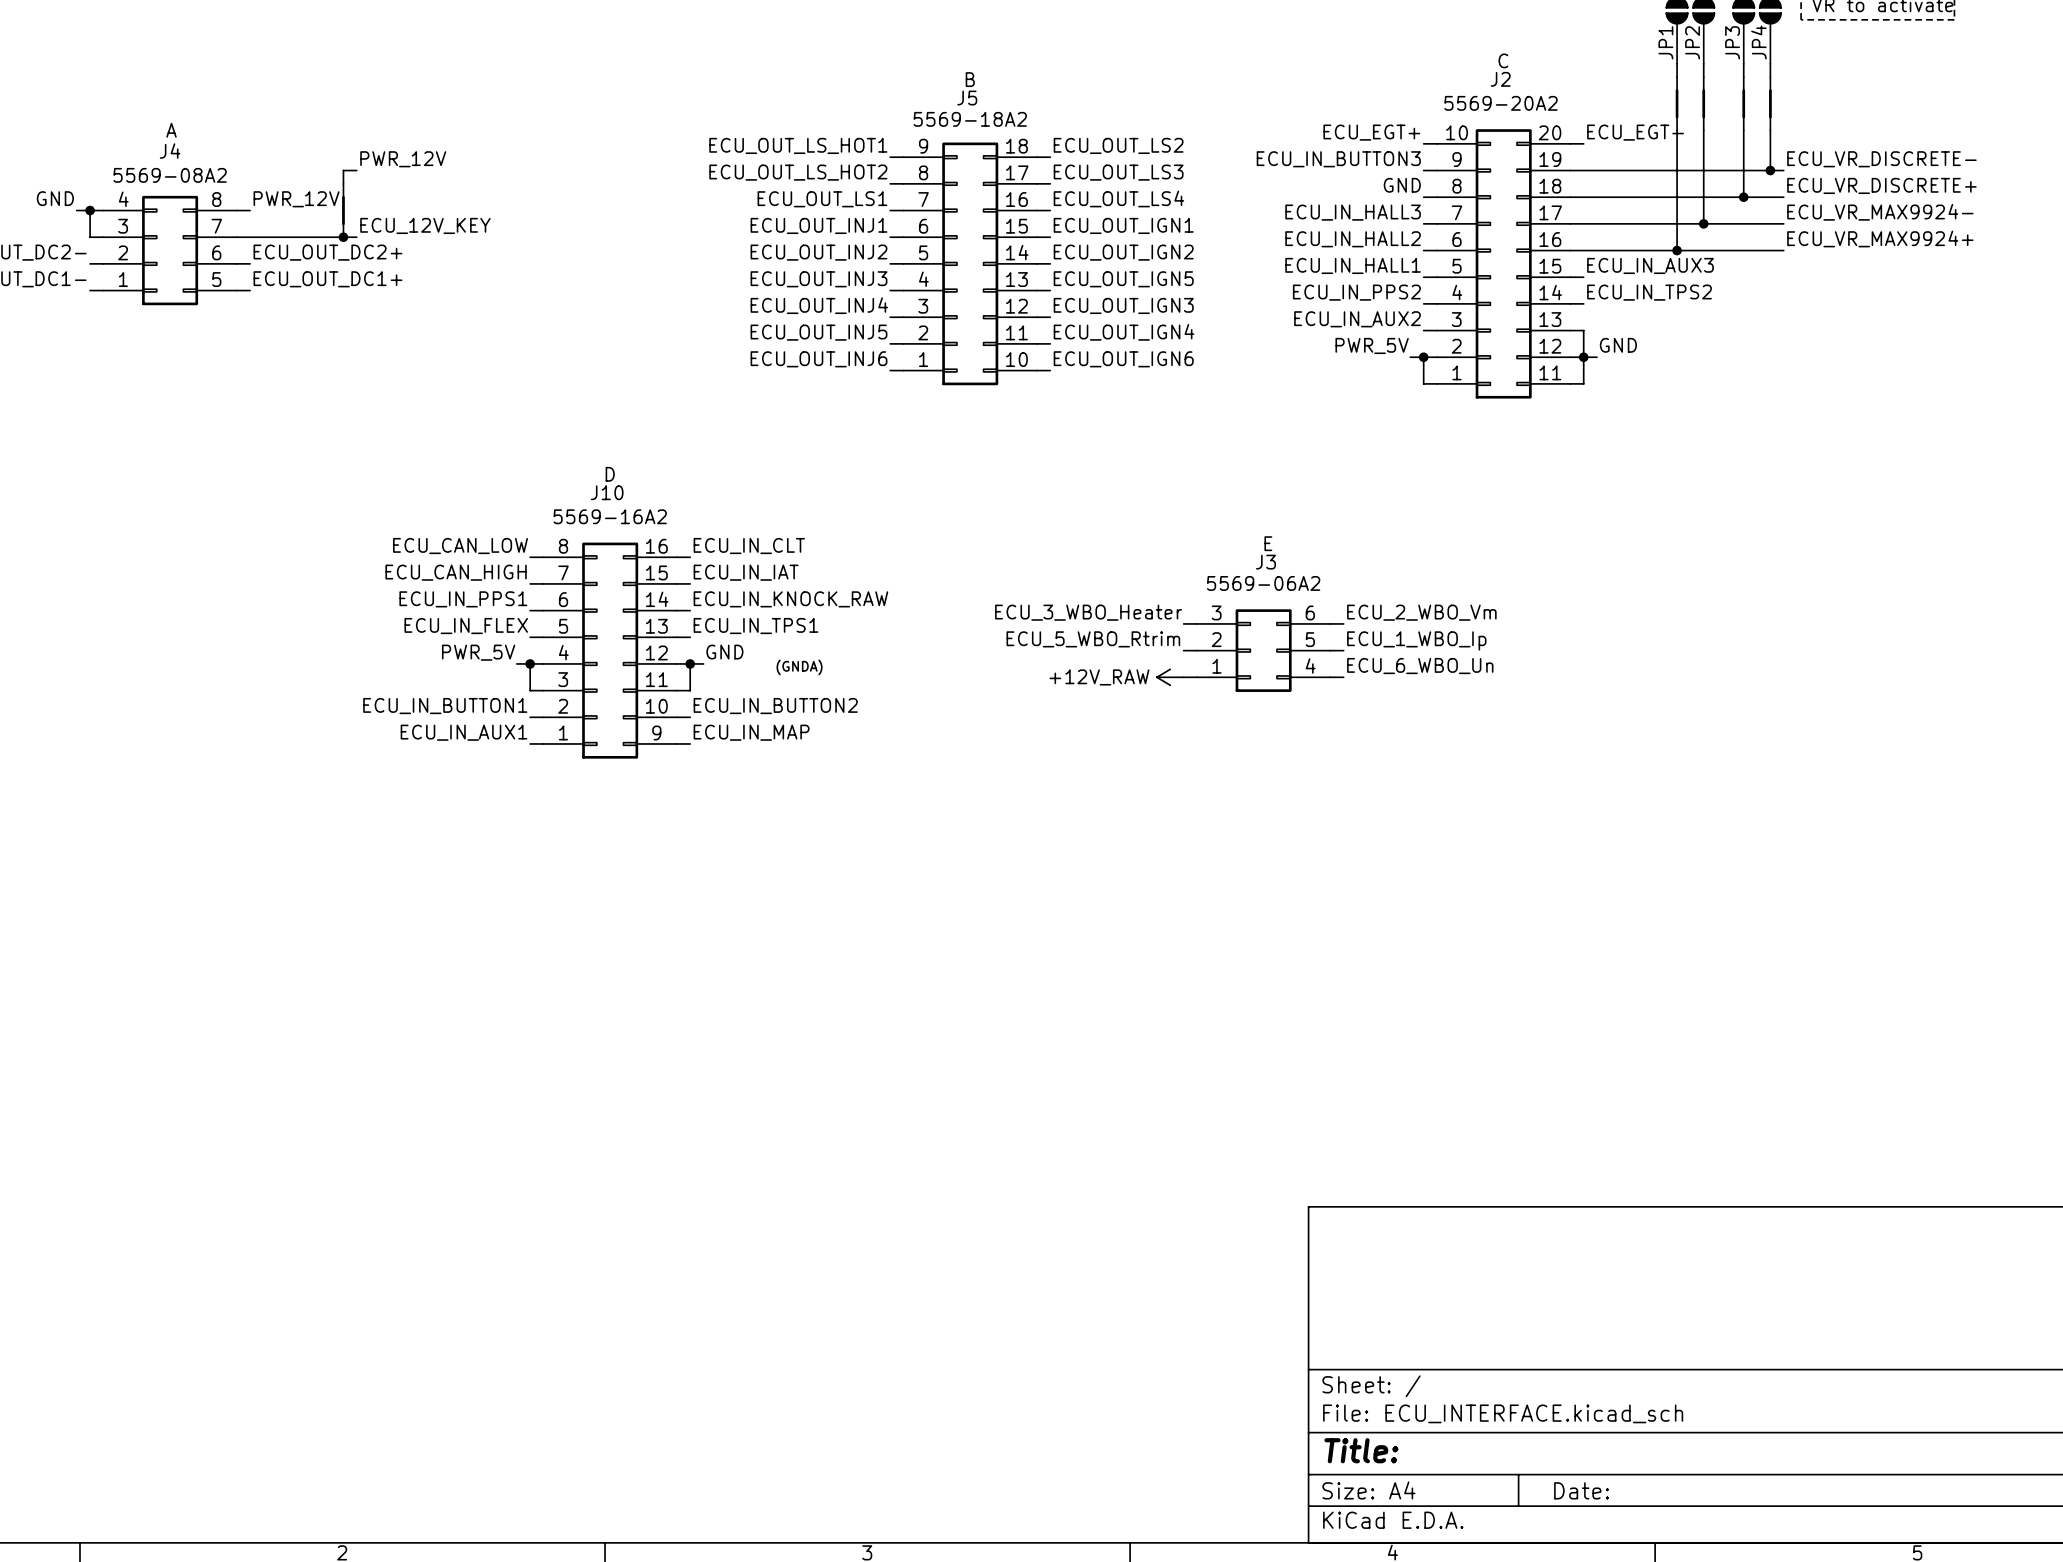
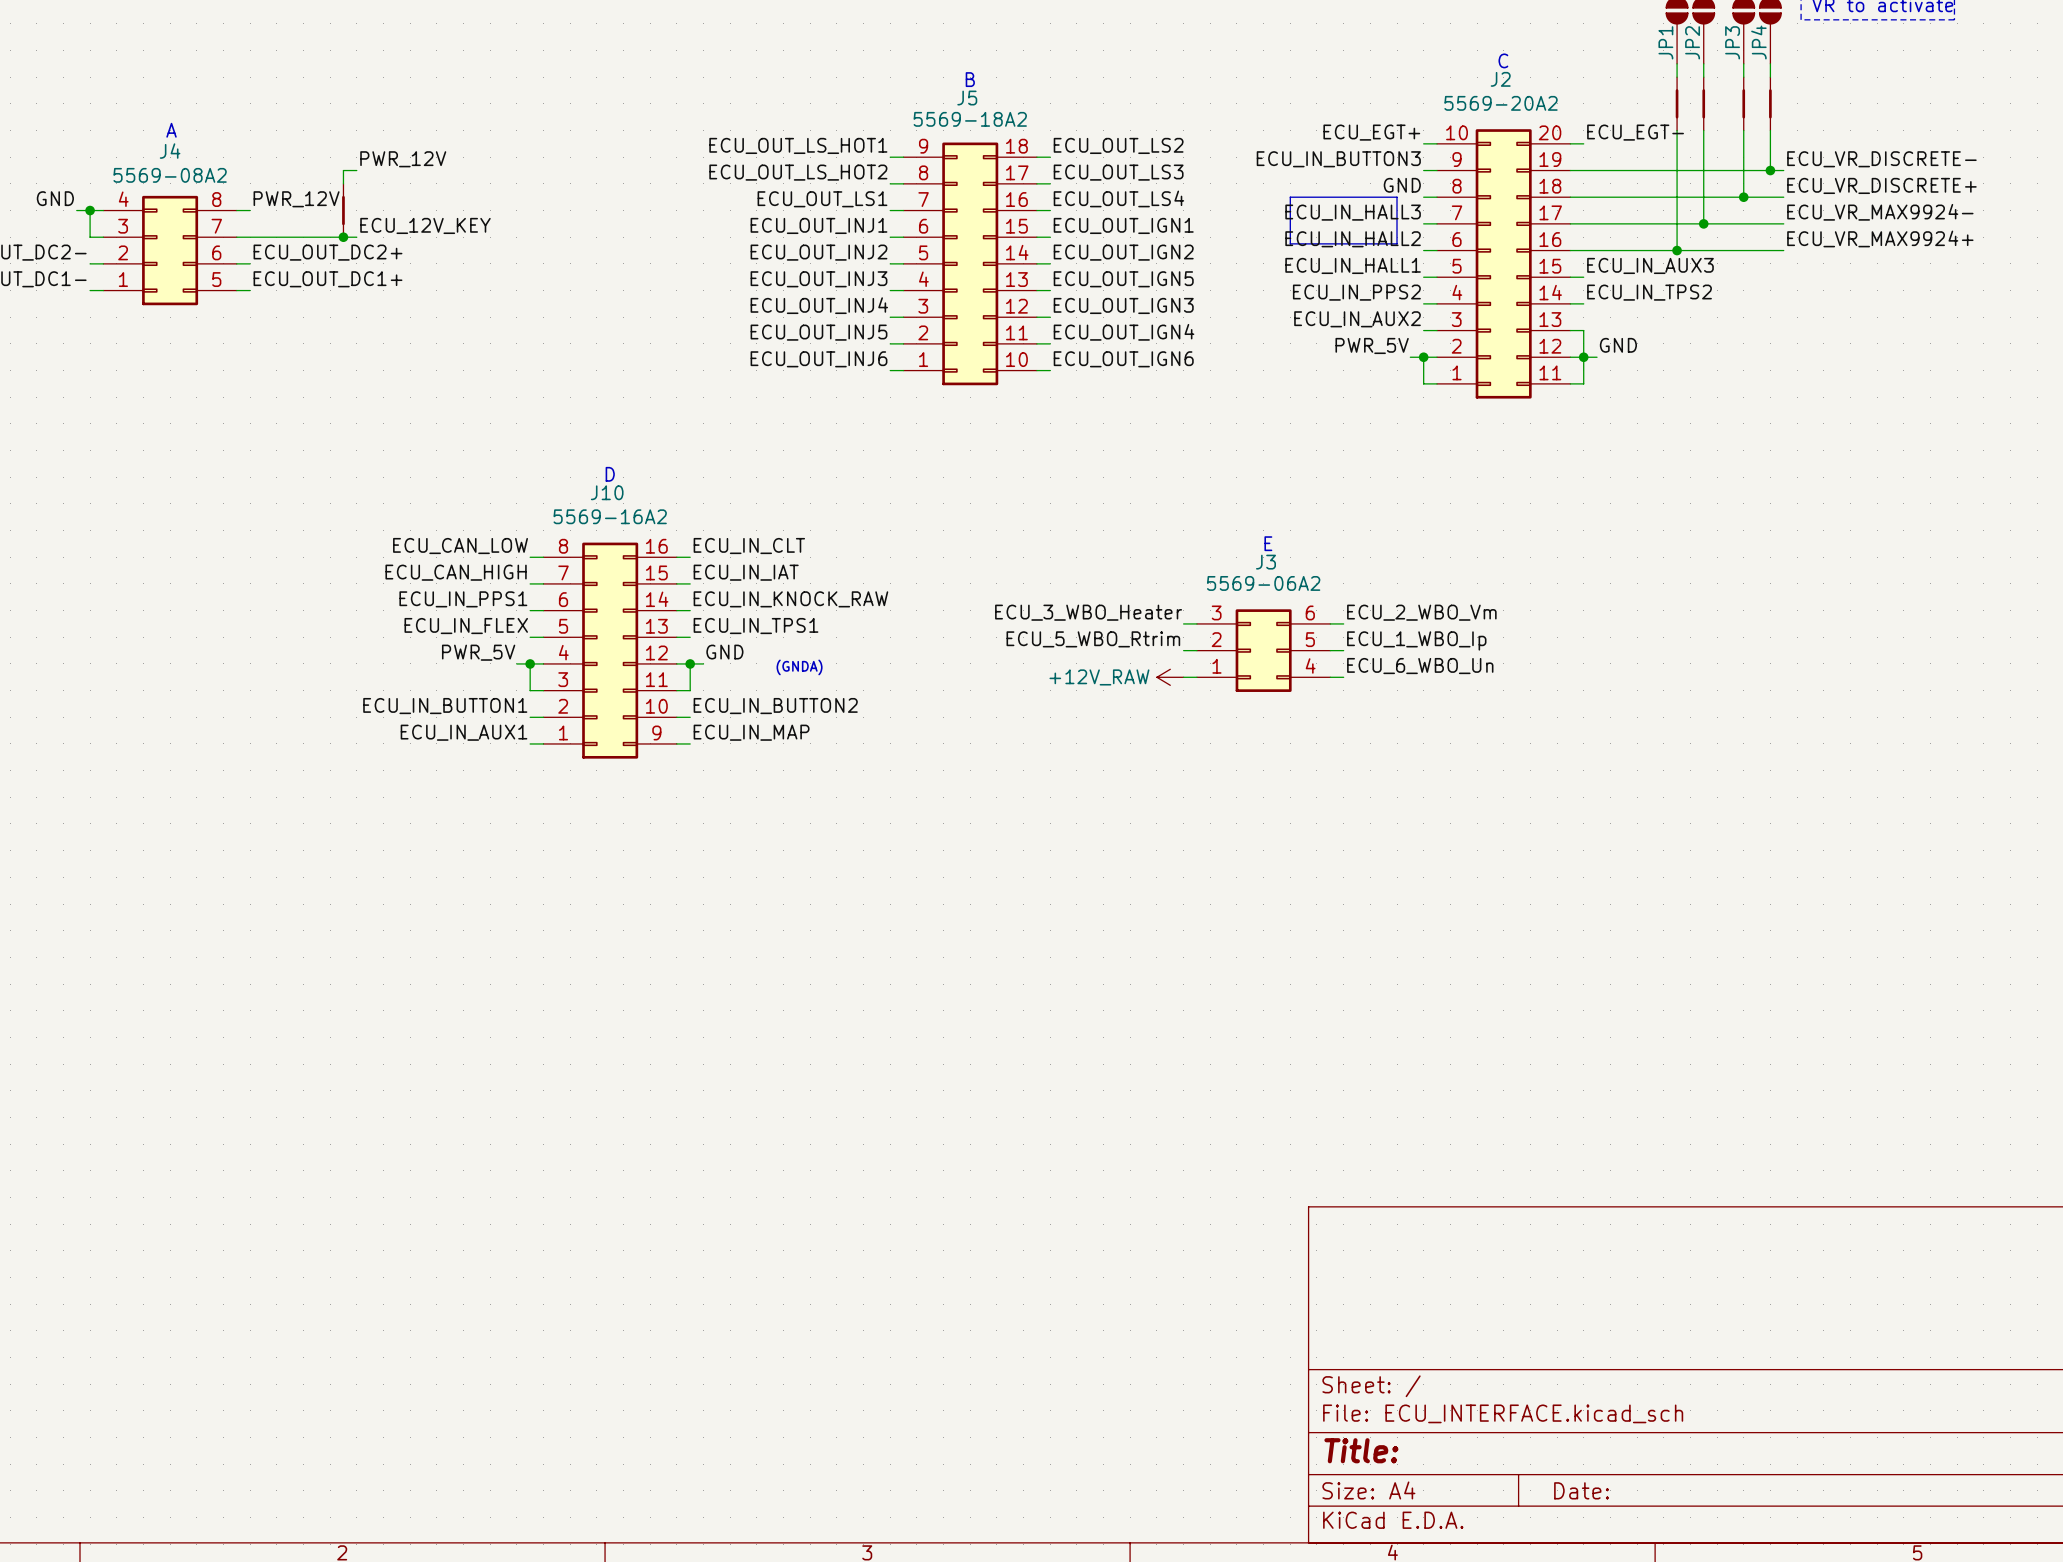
line: none -> (1290, 197) (1397, 197) (1397, 243) (1290, 243) (1290, 197)

